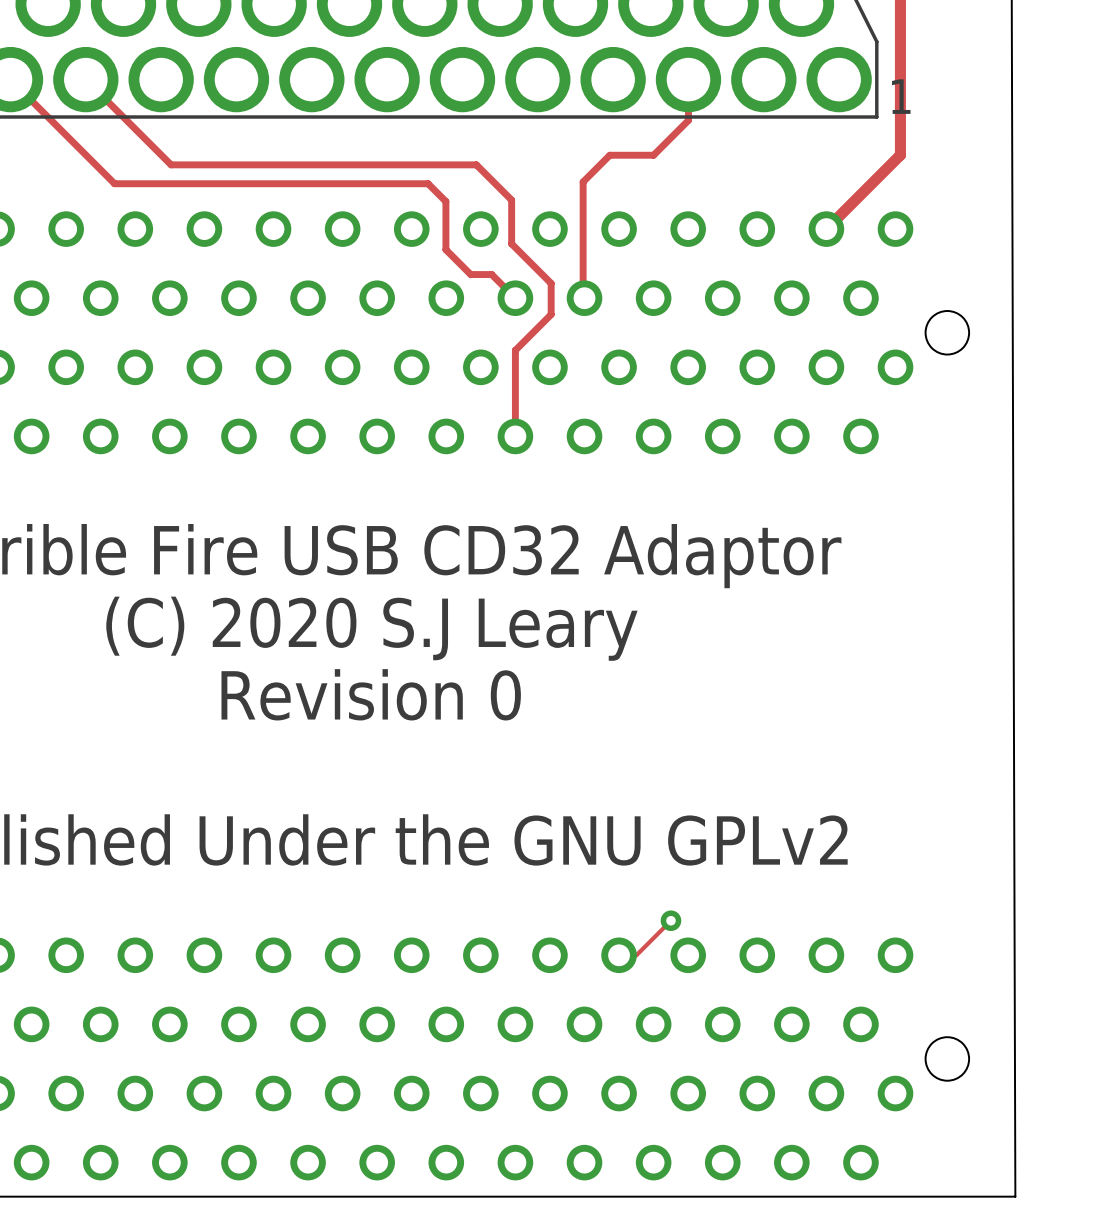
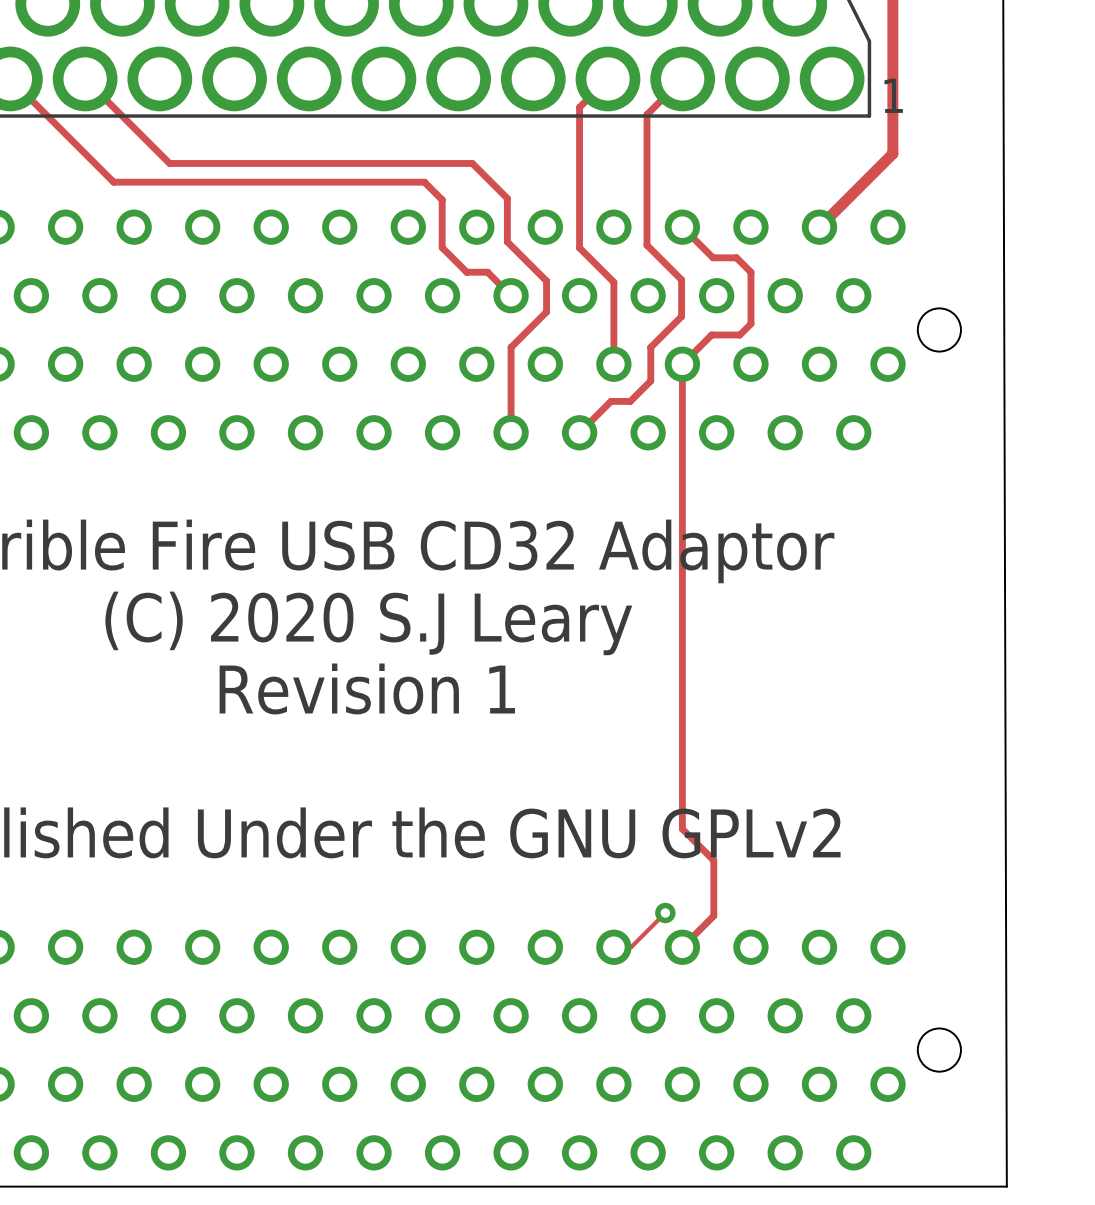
track: none -> (608, 78) (579, 107) (579, 247) (613, 282) (613, 364)
track: (688, 79) (688, 120) (653, 155) (609, 155) (583, 181) (584, 298) -> (682, 78) (646, 114) (646, 245) (681, 279) (681, 316) (650, 347) (650, 380) (630, 401) (610, 401) (579, 432)
track: none -> (682, 227) (713, 257) (736, 257) (750, 272) (750, 323) (739, 334) (711, 334) (682, 364) (682, 829) (713, 860) (713, 915) (682, 947)
text: Revision 0 (371, 694) -> Revision 1 (367, 688)

